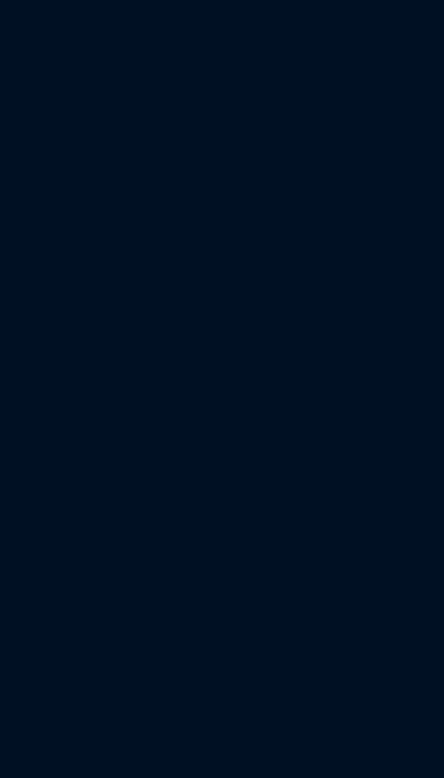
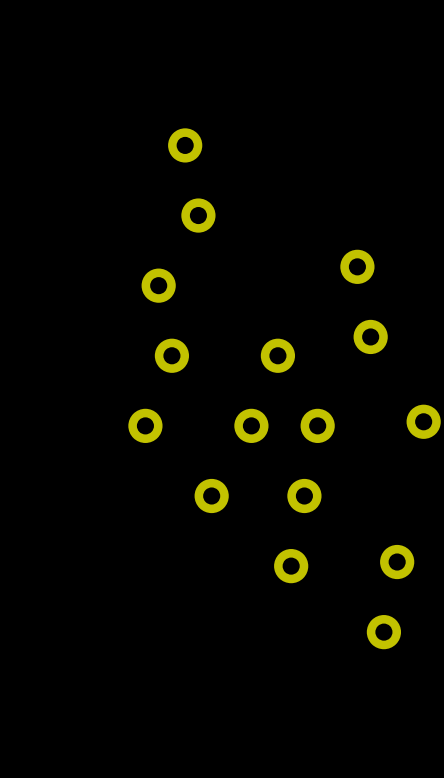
part: none -> (185, 145)
part: none -> (198, 215)
part: none -> (357, 266)
part: none -> (158, 285)
part: none -> (370, 336)
part: none -> (171, 355)
part: none -> (277, 355)
part: none -> (423, 421)
part: none -> (145, 425)
part: none -> (251, 425)
part: none -> (317, 425)
part: none -> (211, 496)
part: none -> (304, 496)
part: none -> (397, 562)
part: none -> (291, 566)
part: none -> (383, 632)

